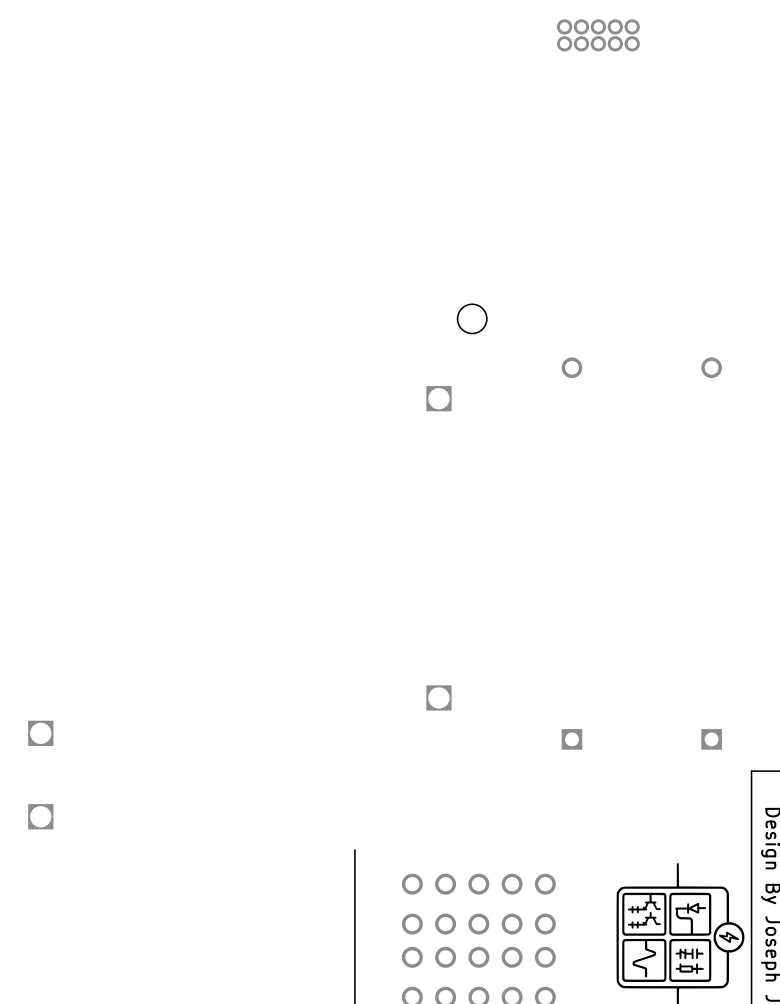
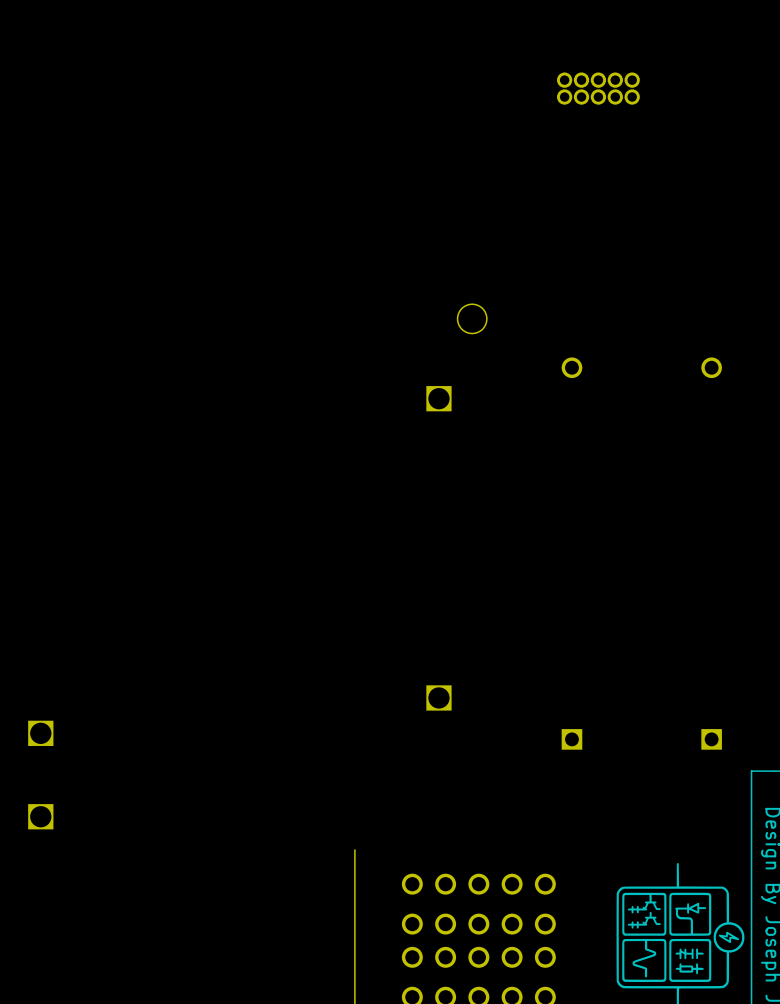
part position: (598, 35) -> (598, 88)

